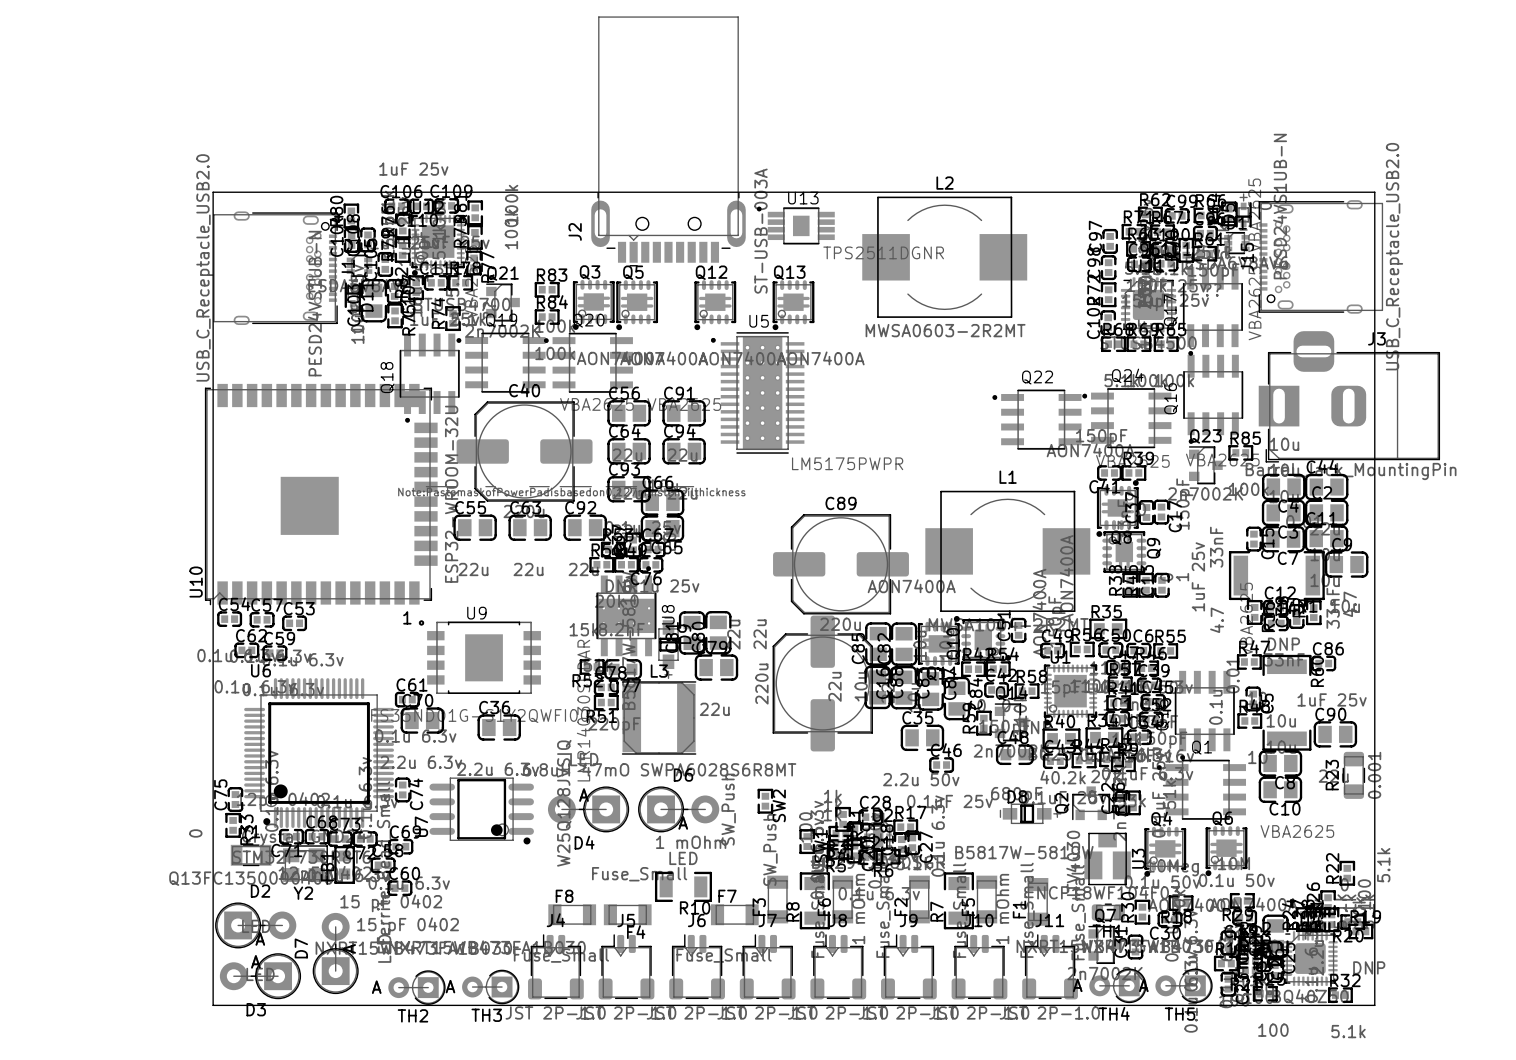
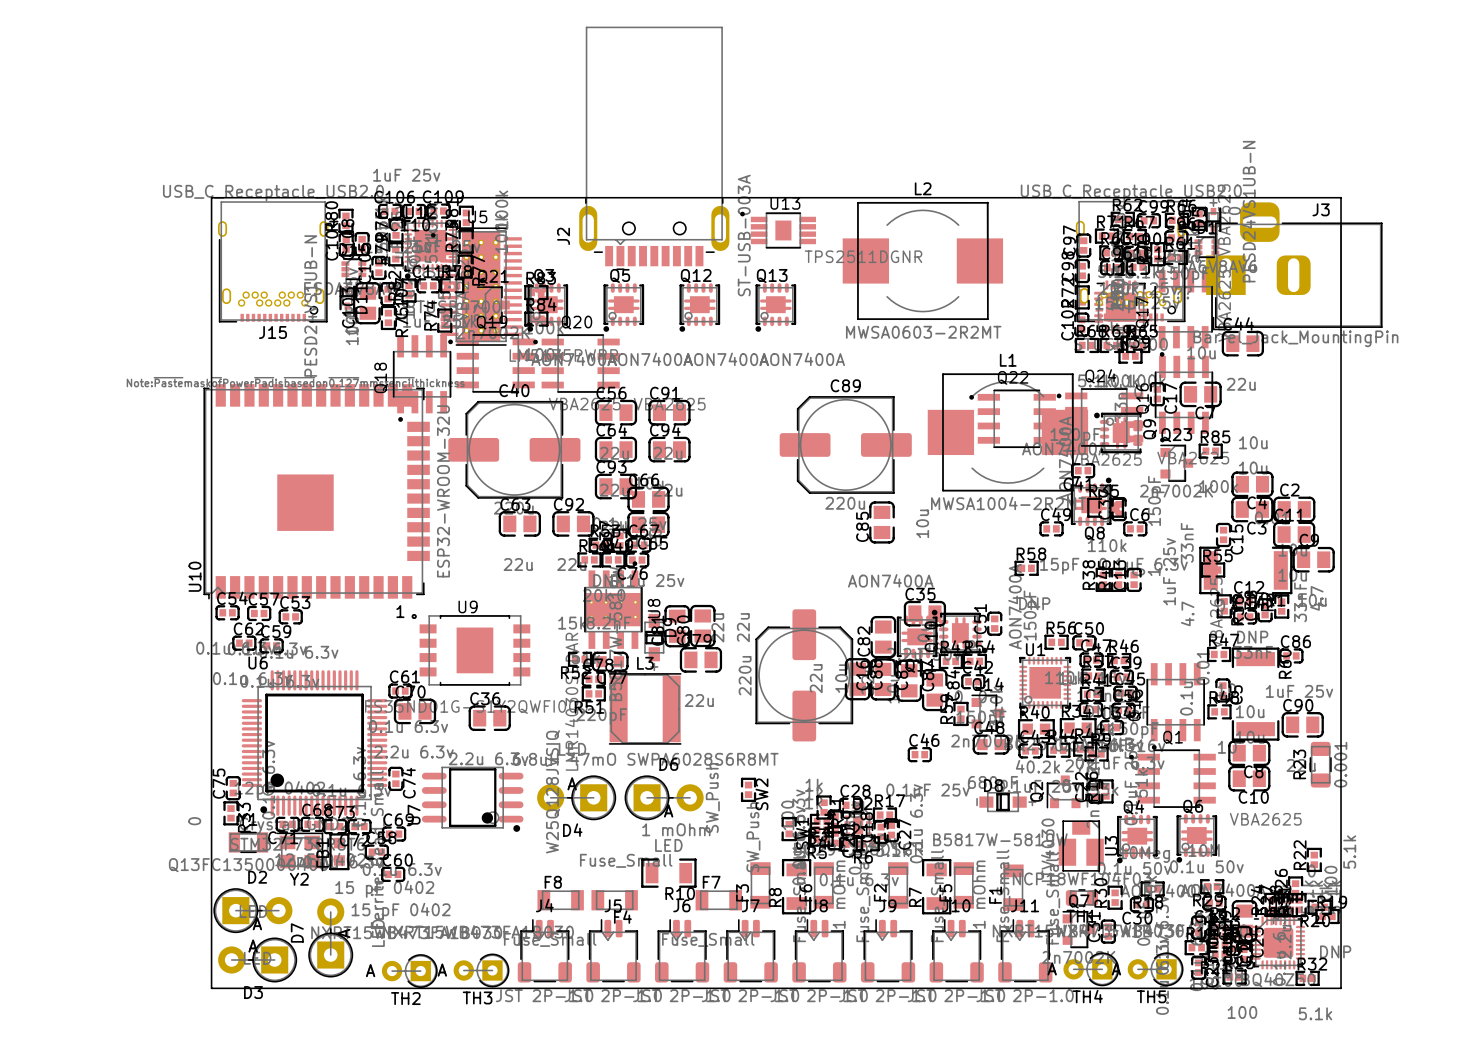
J15 rotation: 0° (1320, 256) -> 90° counterclockwise (273, 261)
J15 position: (1320, 256) -> (273, 261)
J1 rotation: 0° (275, 268) -> 90° clockwise (1131, 261)
J1 position: (275, 268) -> (1131, 261)
Q3 position: (593, 304) -> (547, 307)
U5 position: (757, 392) -> (476, 286)
J3 position: (1349, 396) -> (1294, 266)
R39 position: (1133, 472) -> (1130, 356)
C44 position: (1326, 487) -> (1242, 343)
C17 position: (1161, 512) -> (1157, 394)
C55: 22u (475, 527) -> none
C7 position: (1283, 539) -> (1200, 394)
L1 position: (1007, 551) -> (1007, 432)
Q9 position: (1121, 551) -> (1118, 432)
C89 position: (841, 564) -> (845, 444)
R35 position: (1108, 628) -> (1105, 507)
C85 position: (878, 643) -> (882, 522)
C49 position: (1052, 650) -> (1051, 528)
C6 position: (1138, 650) -> (1135, 528)
R55 position: (1165, 650) -> (1213, 569)
R58 position: (1027, 691) -> (1026, 568)
C35 position: (922, 737) -> (924, 613)

